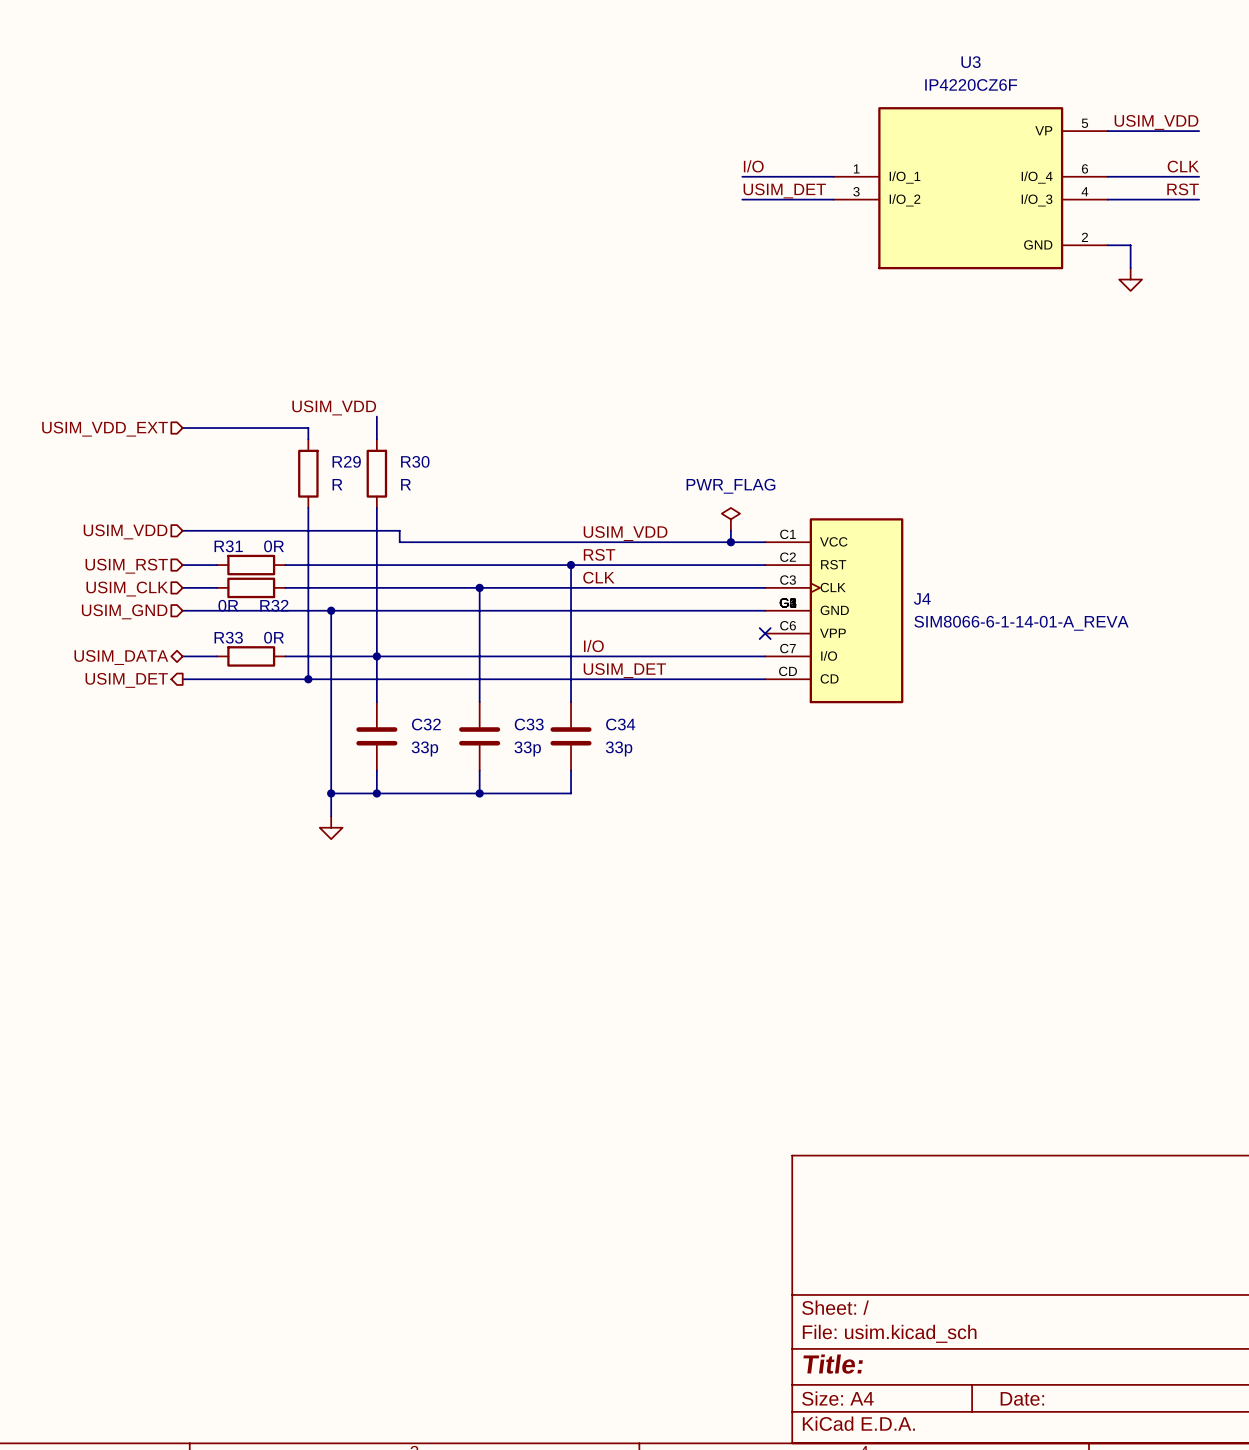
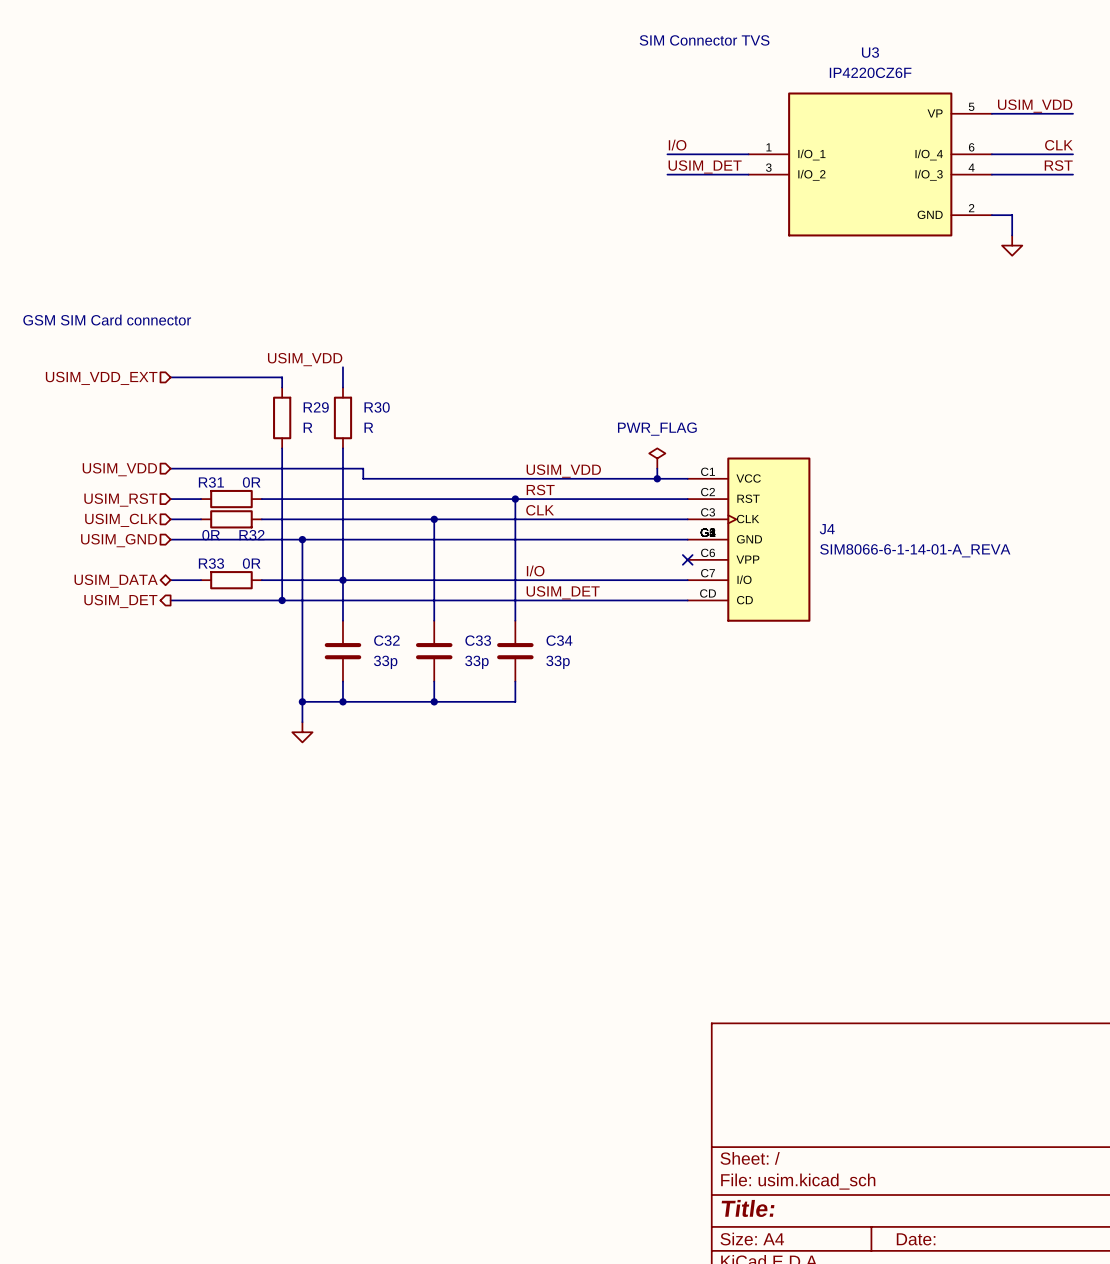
text: none -> SIM Connector TVS (704, 40)
text: none -> GSM SIM Card connector (107, 320)

